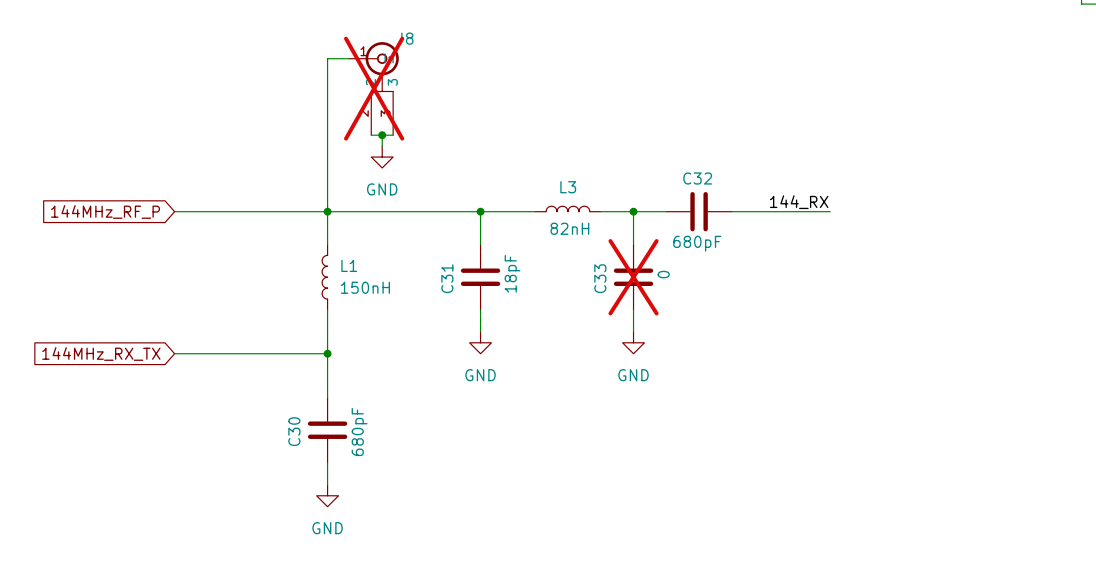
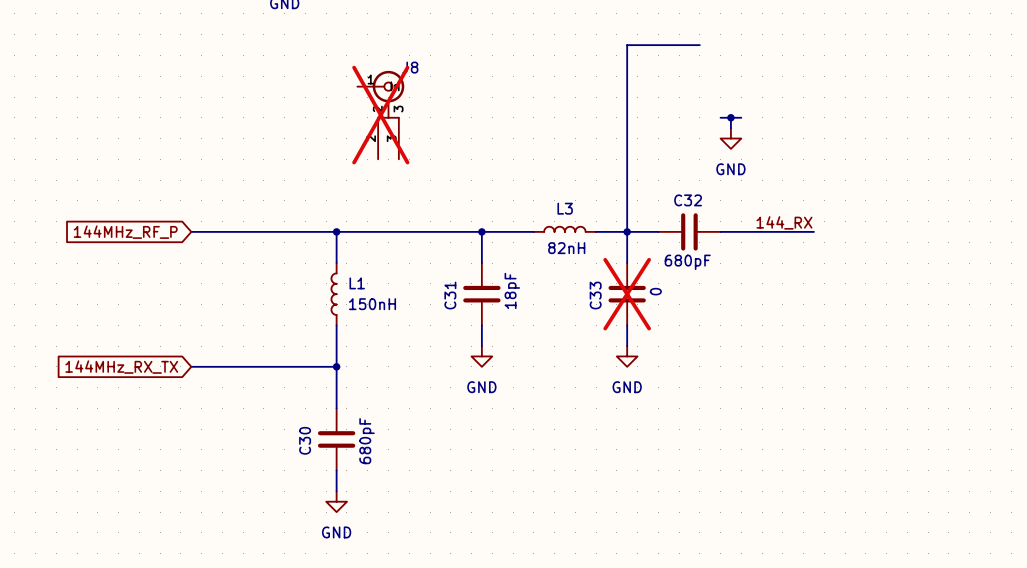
wire: none -> (699, 45) (627, 45) (627, 231)
wire: (349, 58) (327, 58) (327, 211) -> none
wire: none -> (720, 117) (741, 117)
wire: none -> (730, 117) (730, 128)
junction: none -> (730, 117)
power symbol: none -> GND (730, 138)
wire: (371, 135) (393, 135) -> none
wire: (382, 135) (382, 146) -> none
junction: (382, 135) -> none
power symbol: GND (382, 157) -> none

